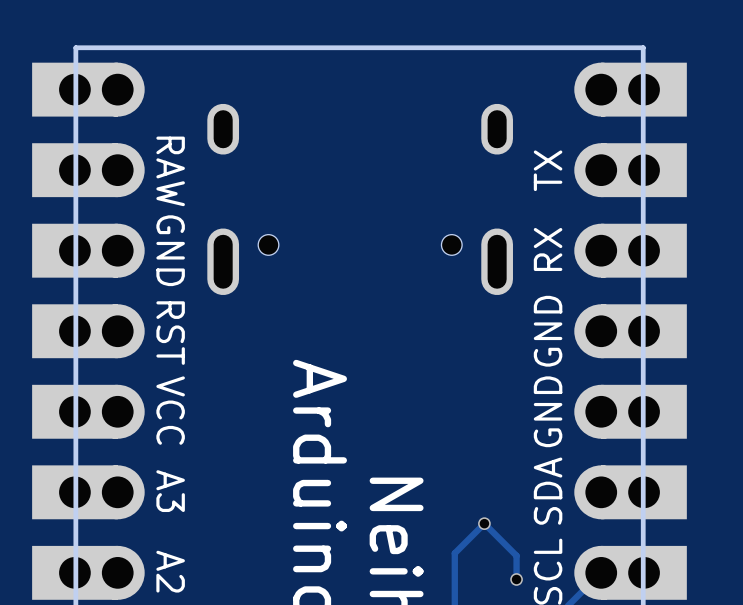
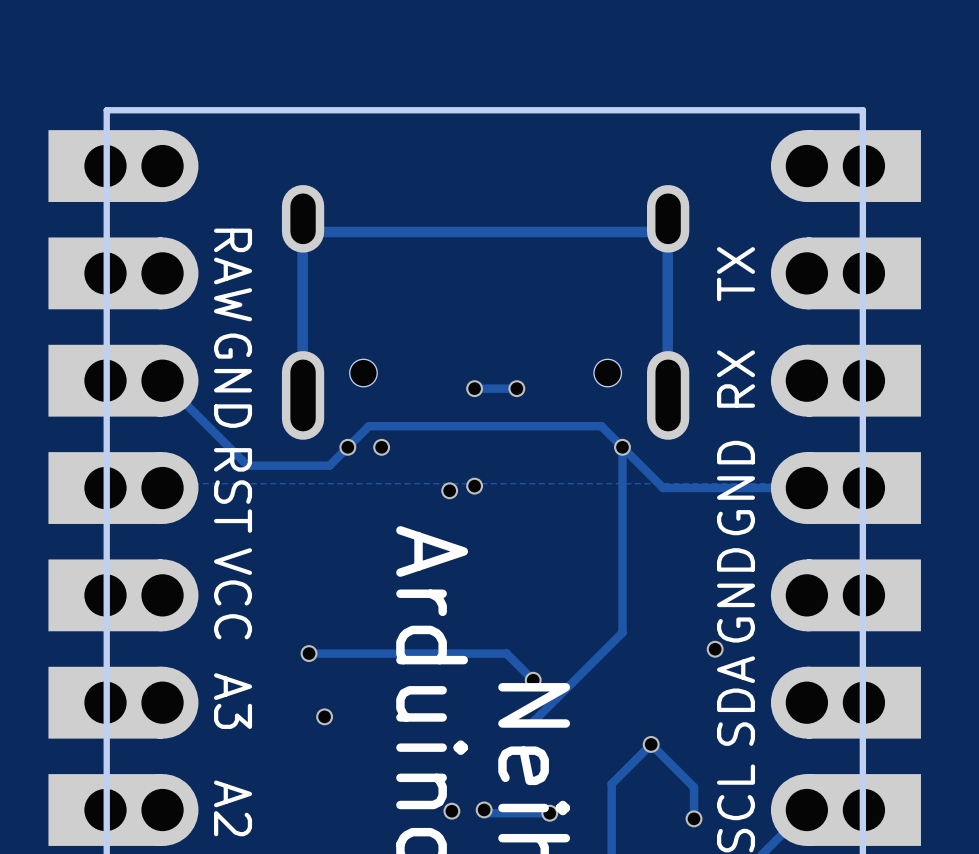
track: none -> (162, 380) (247, 465) (329, 465) (368, 426) (601, 426) (663, 488) (848, 488)
via: none -> (474, 388)
track: none -> (516, 388) (474, 388)
via: none -> (516, 388)
track: none -> (667, 408) (667, 232) (302, 232) (302, 408)
via: none -> (347, 447)
via: none -> (381, 447)
track: none -> (622, 447) (622, 632) (533, 721)
via: none -> (622, 447)
zone outline: none -> (861, 483) (108, 483)
via: none -> (474, 486)
via: none -> (449, 490)
via: none -> (715, 649)
track: none -> (309, 653) (506, 653) (533, 680)
via: none -> (309, 653)
via: none -> (533, 680)
via: none -> (324, 716)
track: none -> (484, 809) (487, 813) (549, 813)
via: none -> (484, 809)
via: none -> (451, 811)
via: none -> (549, 813)

